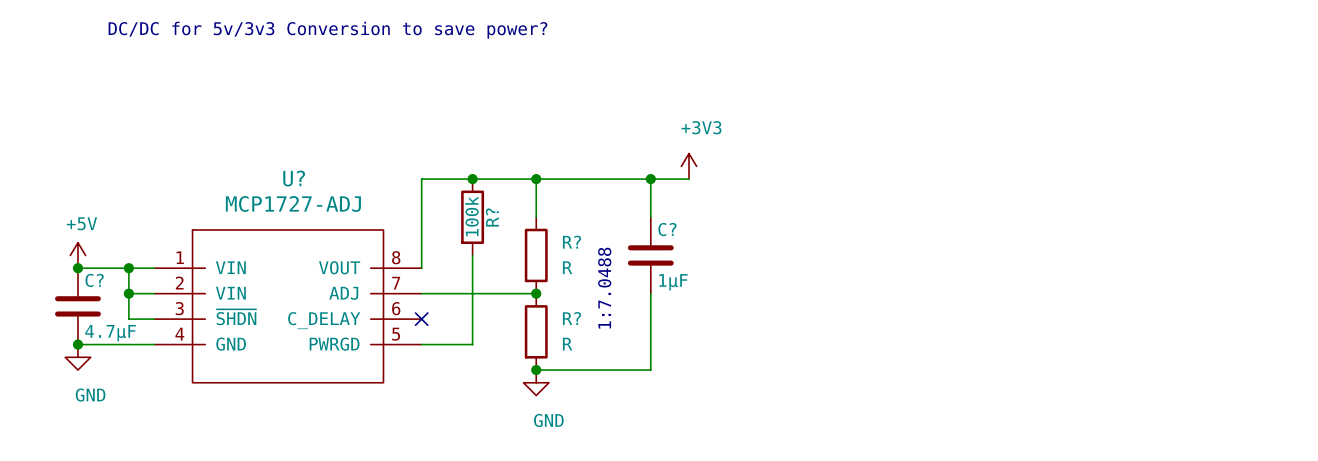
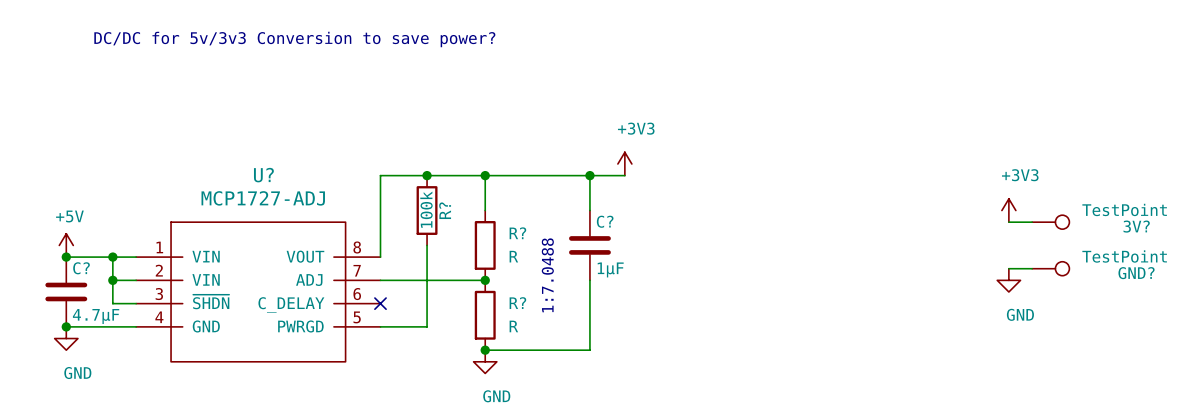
power symbol: none -> +3V3 (1008, 210)
wire: none -> (1008, 222) (1032, 222)
3V?: none -> TestPoint (1050, 222)
wire: none -> (1008, 268) (1032, 268)
GND?: none -> TestPoint (1050, 268)
power symbol: none -> GND (1008, 280)

